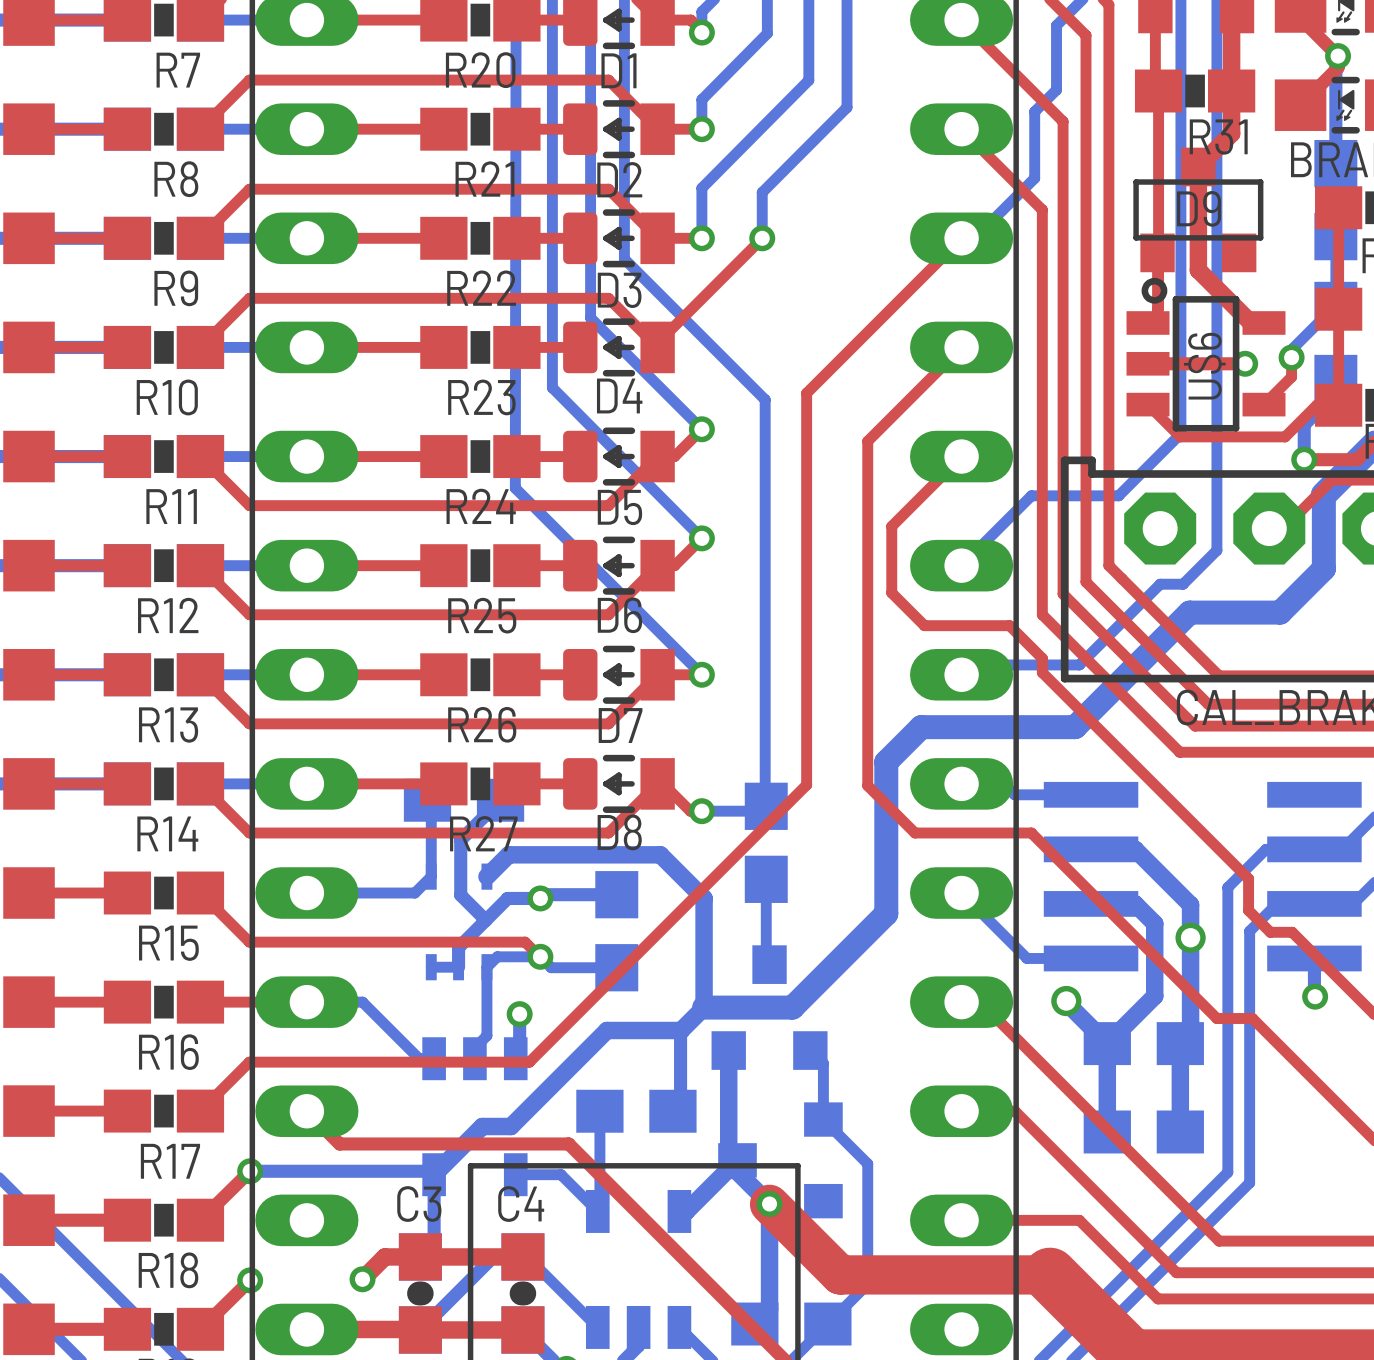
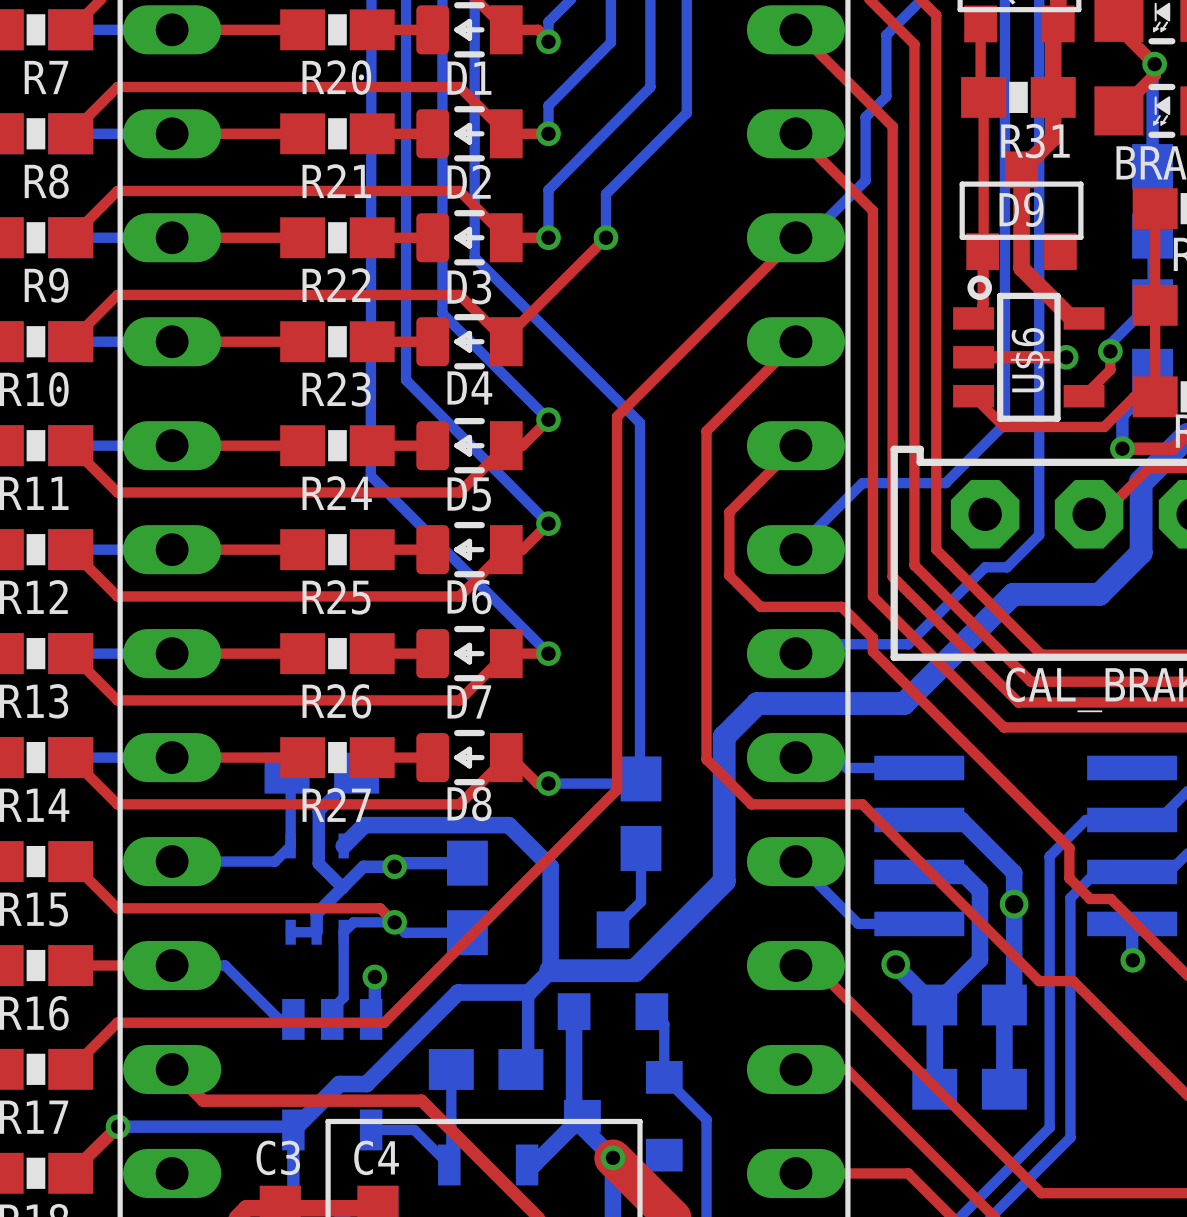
top track: (806, 393) (806, 784) (773, 817) -> (648, 385) (617, 416) (617, 789)
bottom track: (765, 399) (766, 811) -> (608, 391) (640, 422) (641, 778) (636, 778) (632, 783) (609, 783)
part position: (766, 842) -> (641, 813)
bottom track: (766, 879) (766, 961) (769, 964) -> (641, 848) (641, 901) (612, 929)

